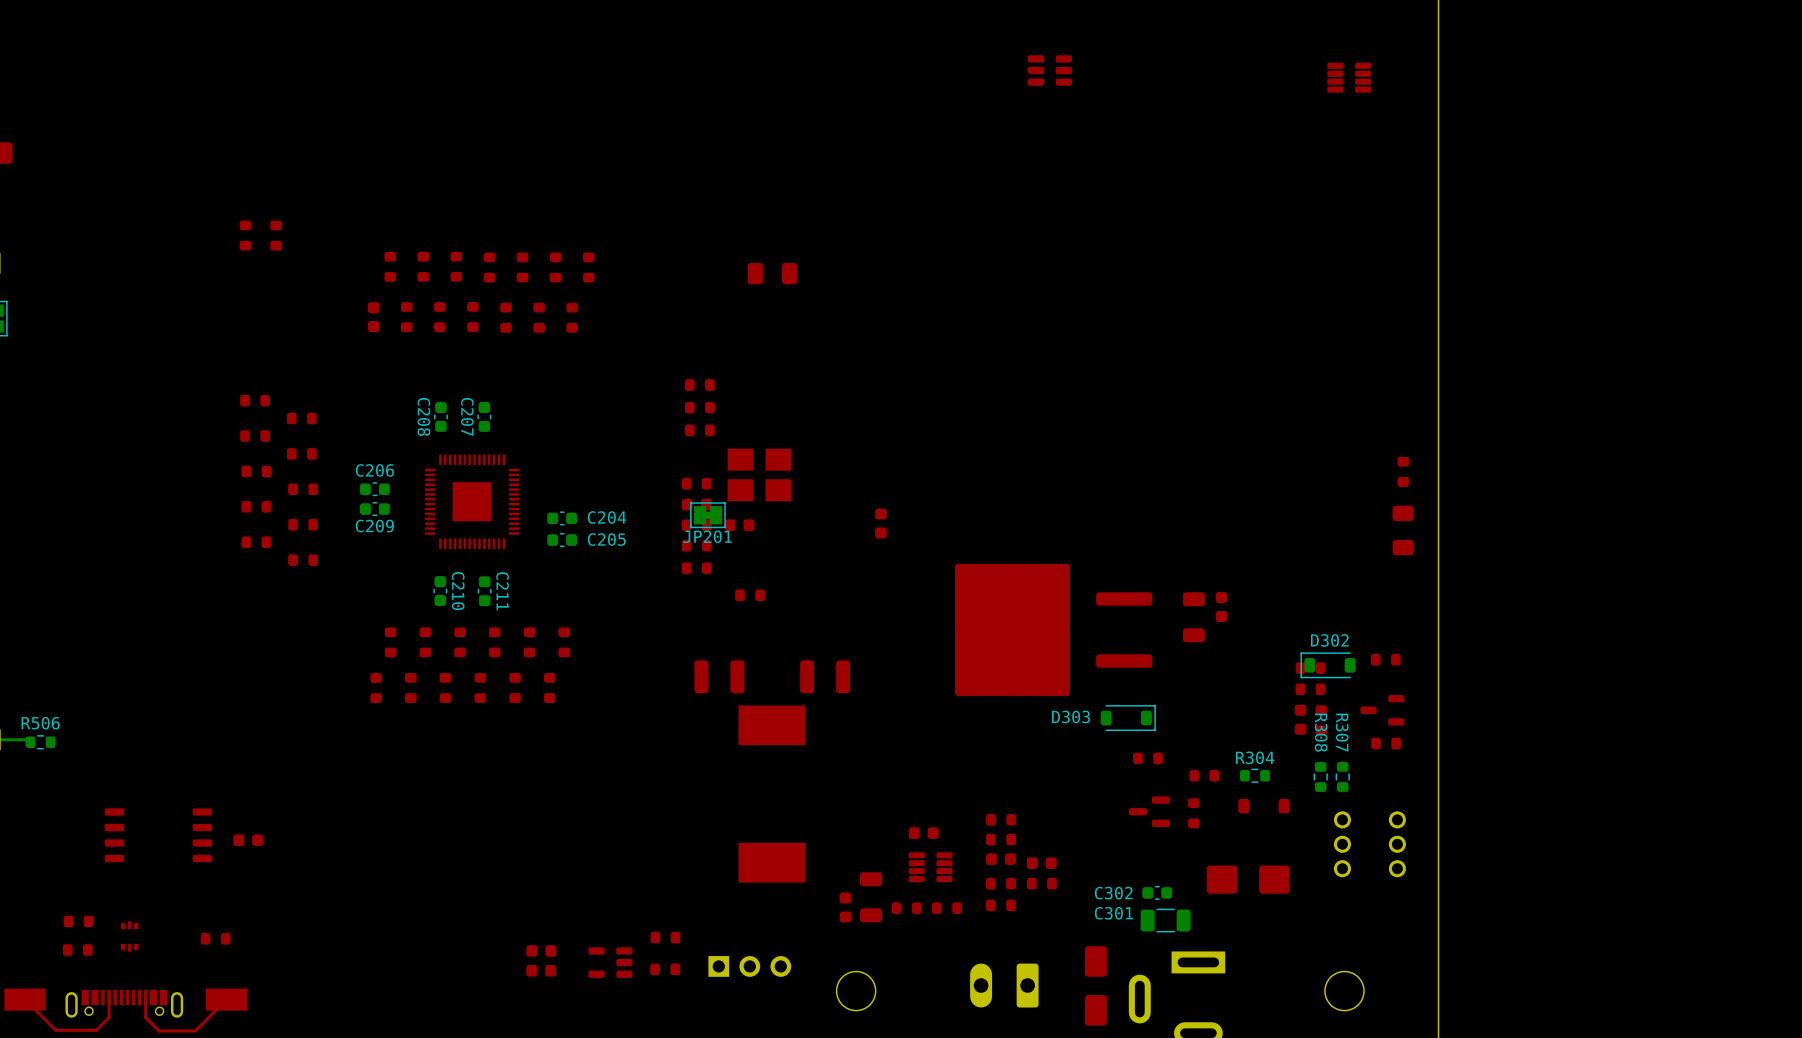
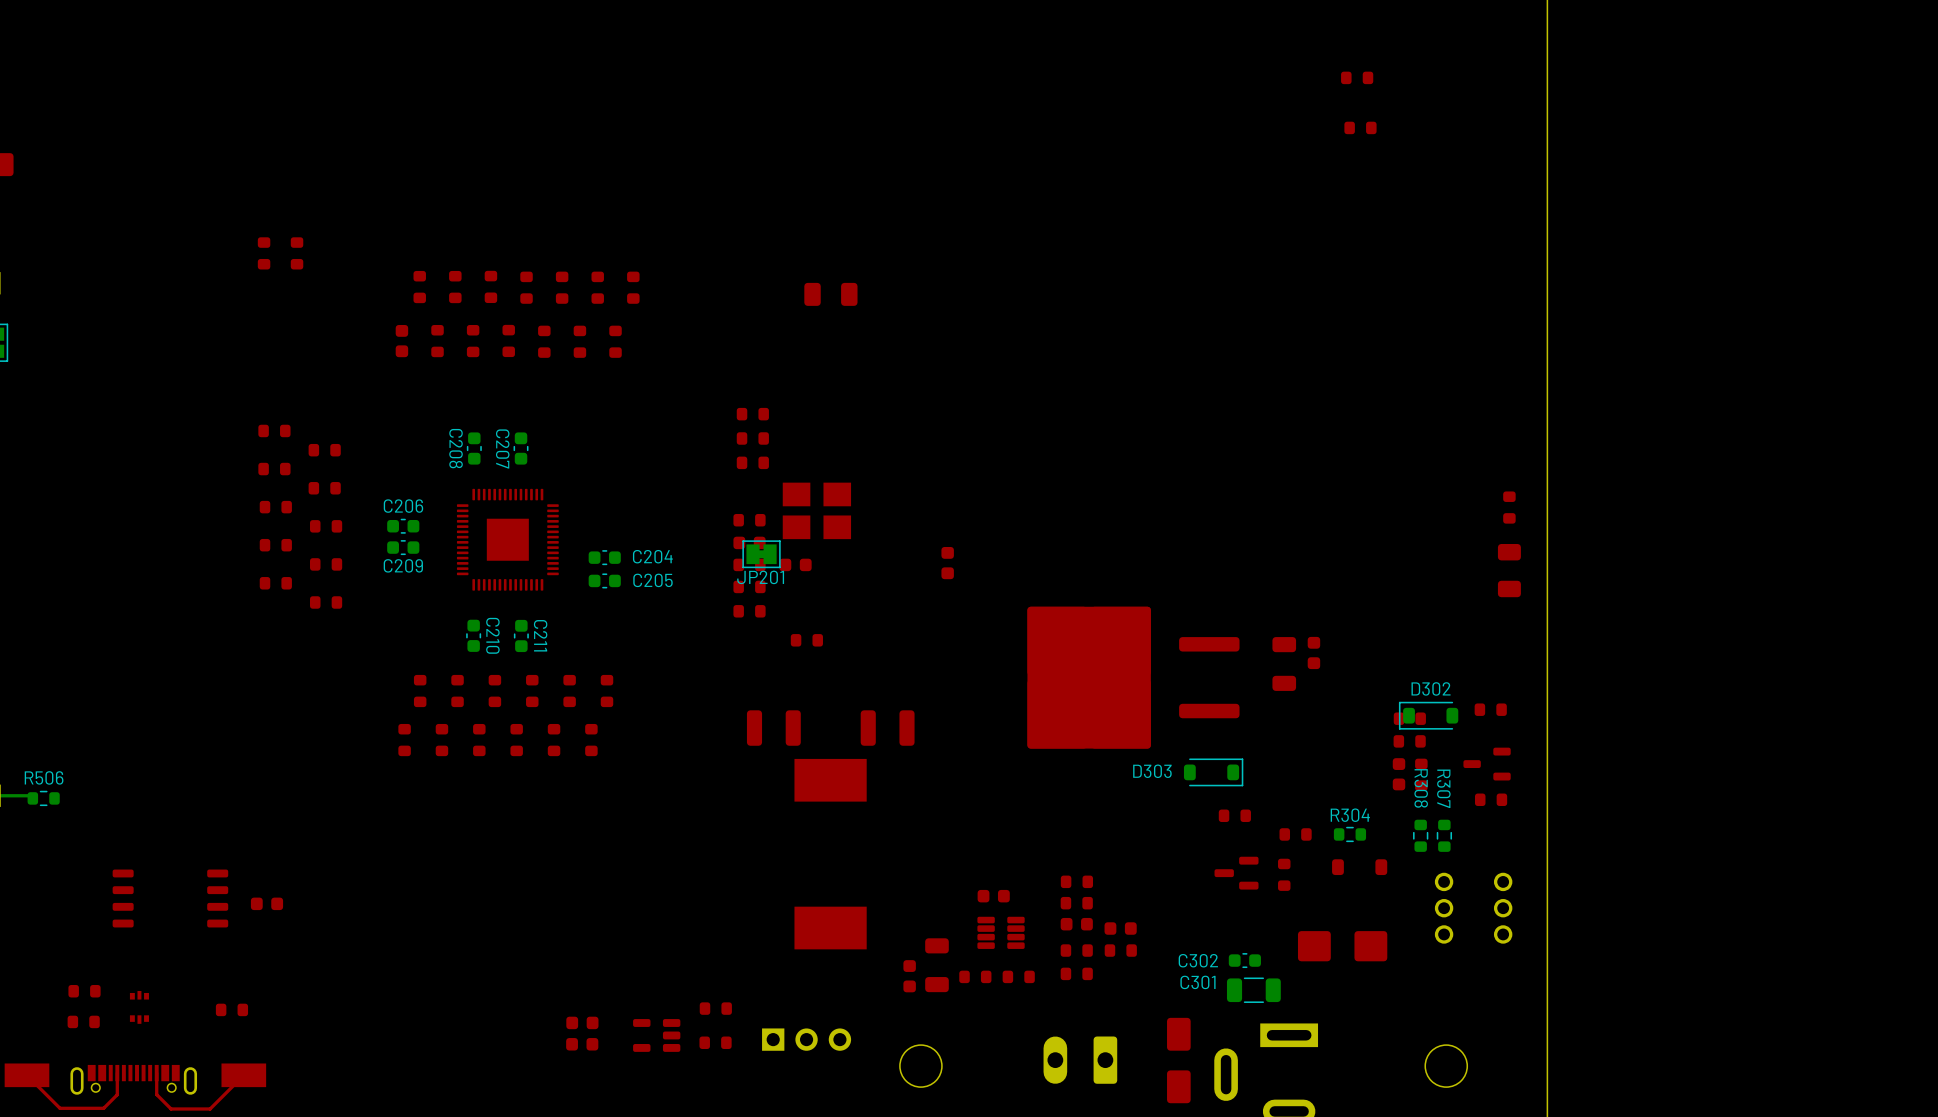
part: (1049, 70) -> none
part: none -> (1357, 77)
part: (1349, 77) -> none
part: none -> (1360, 127)

